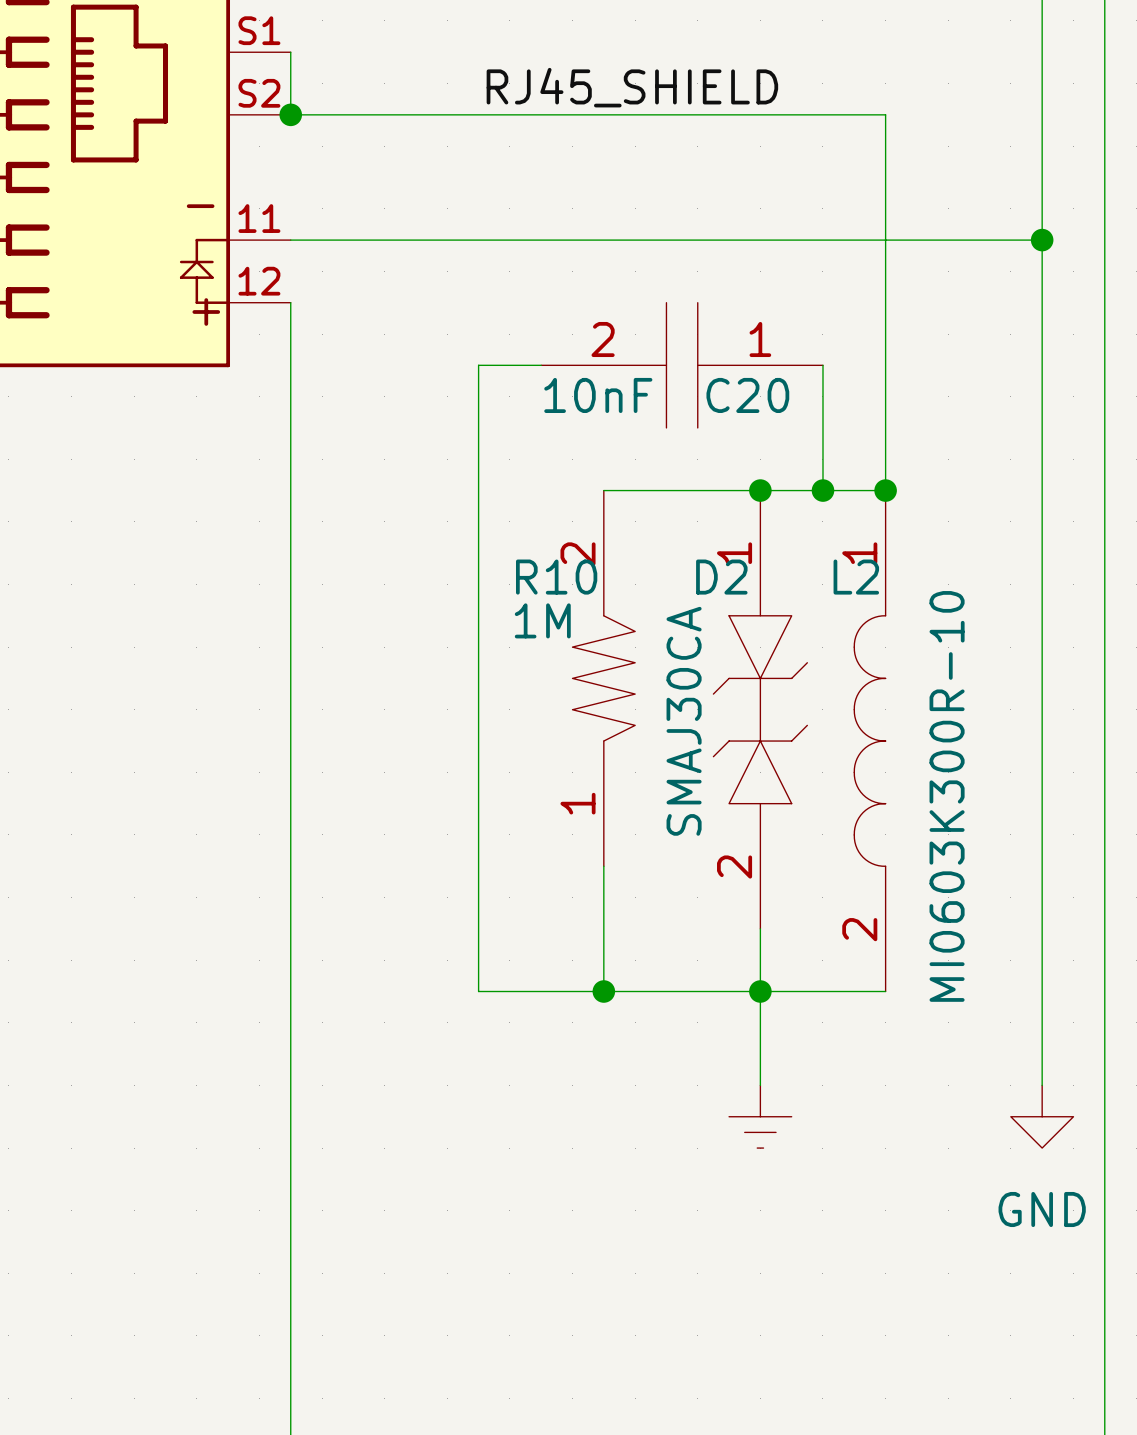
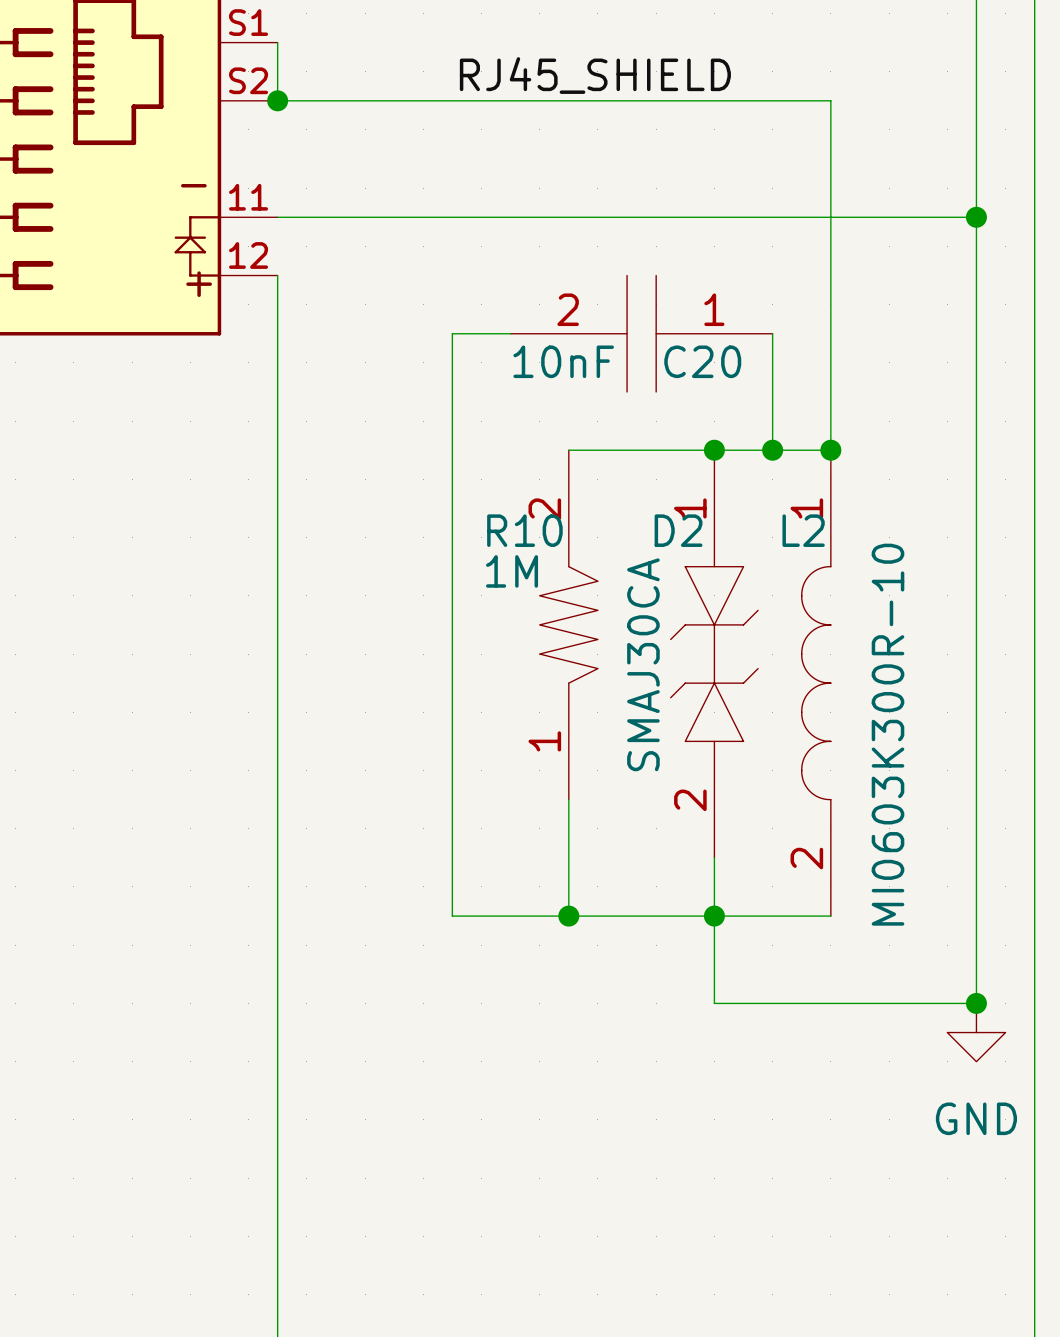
wire: none -> (714, 1003) (976, 1003)
junction: none -> (976, 1003)
power symbol: (760, 1116) -> none

